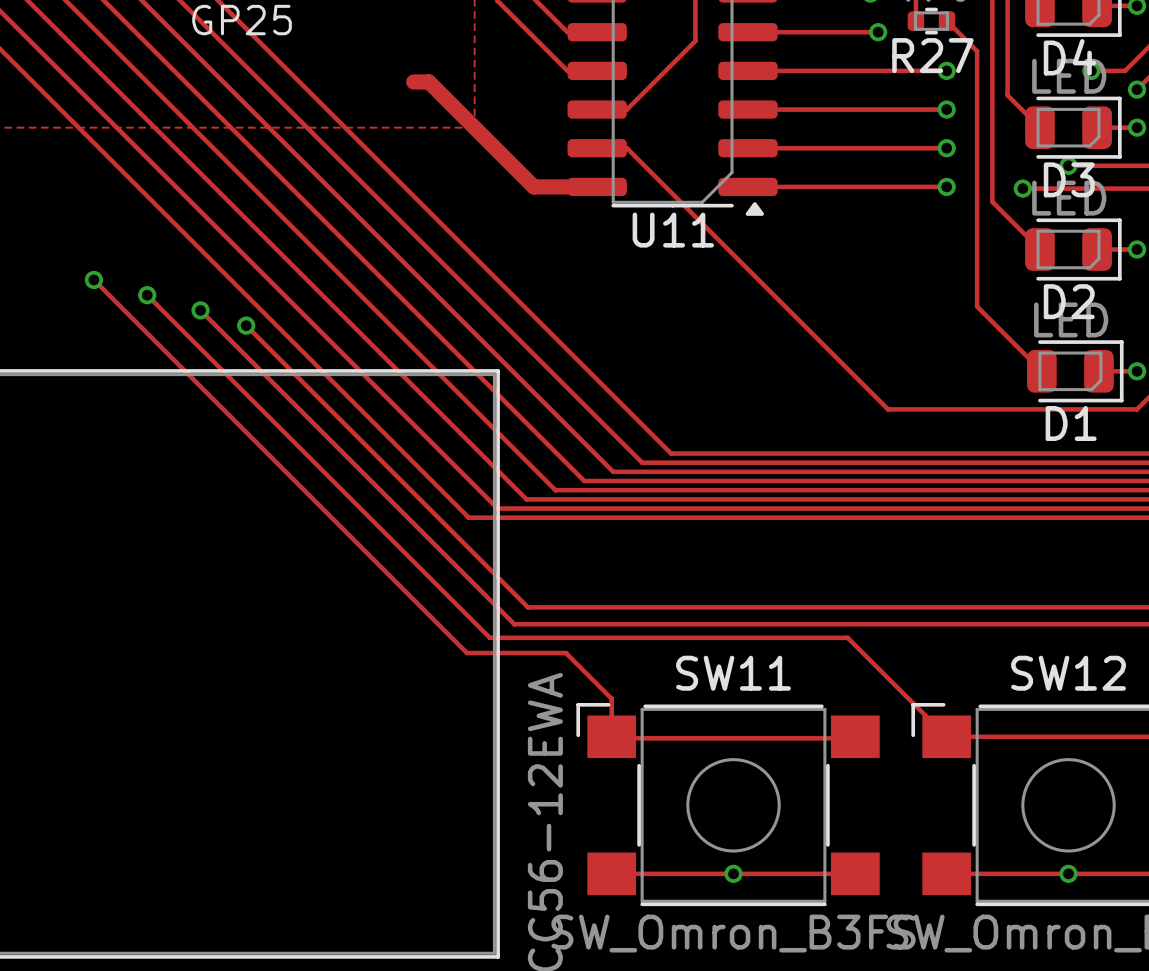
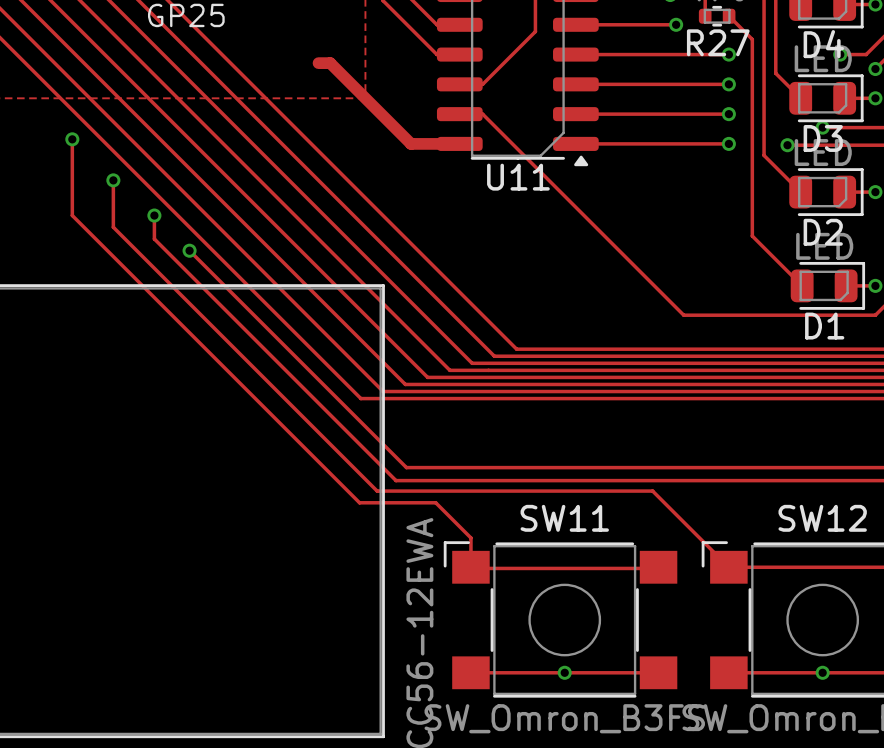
track: none -> (72, 139) (72, 215)
via: none -> (72, 139)
track: none -> (113, 180) (113, 227)
via: none -> (113, 180)
via: (93, 279) -> none
track: none -> (154, 215) (154, 238)
via: none -> (154, 215)
via: (147, 295) -> none
via: (200, 310) -> none

